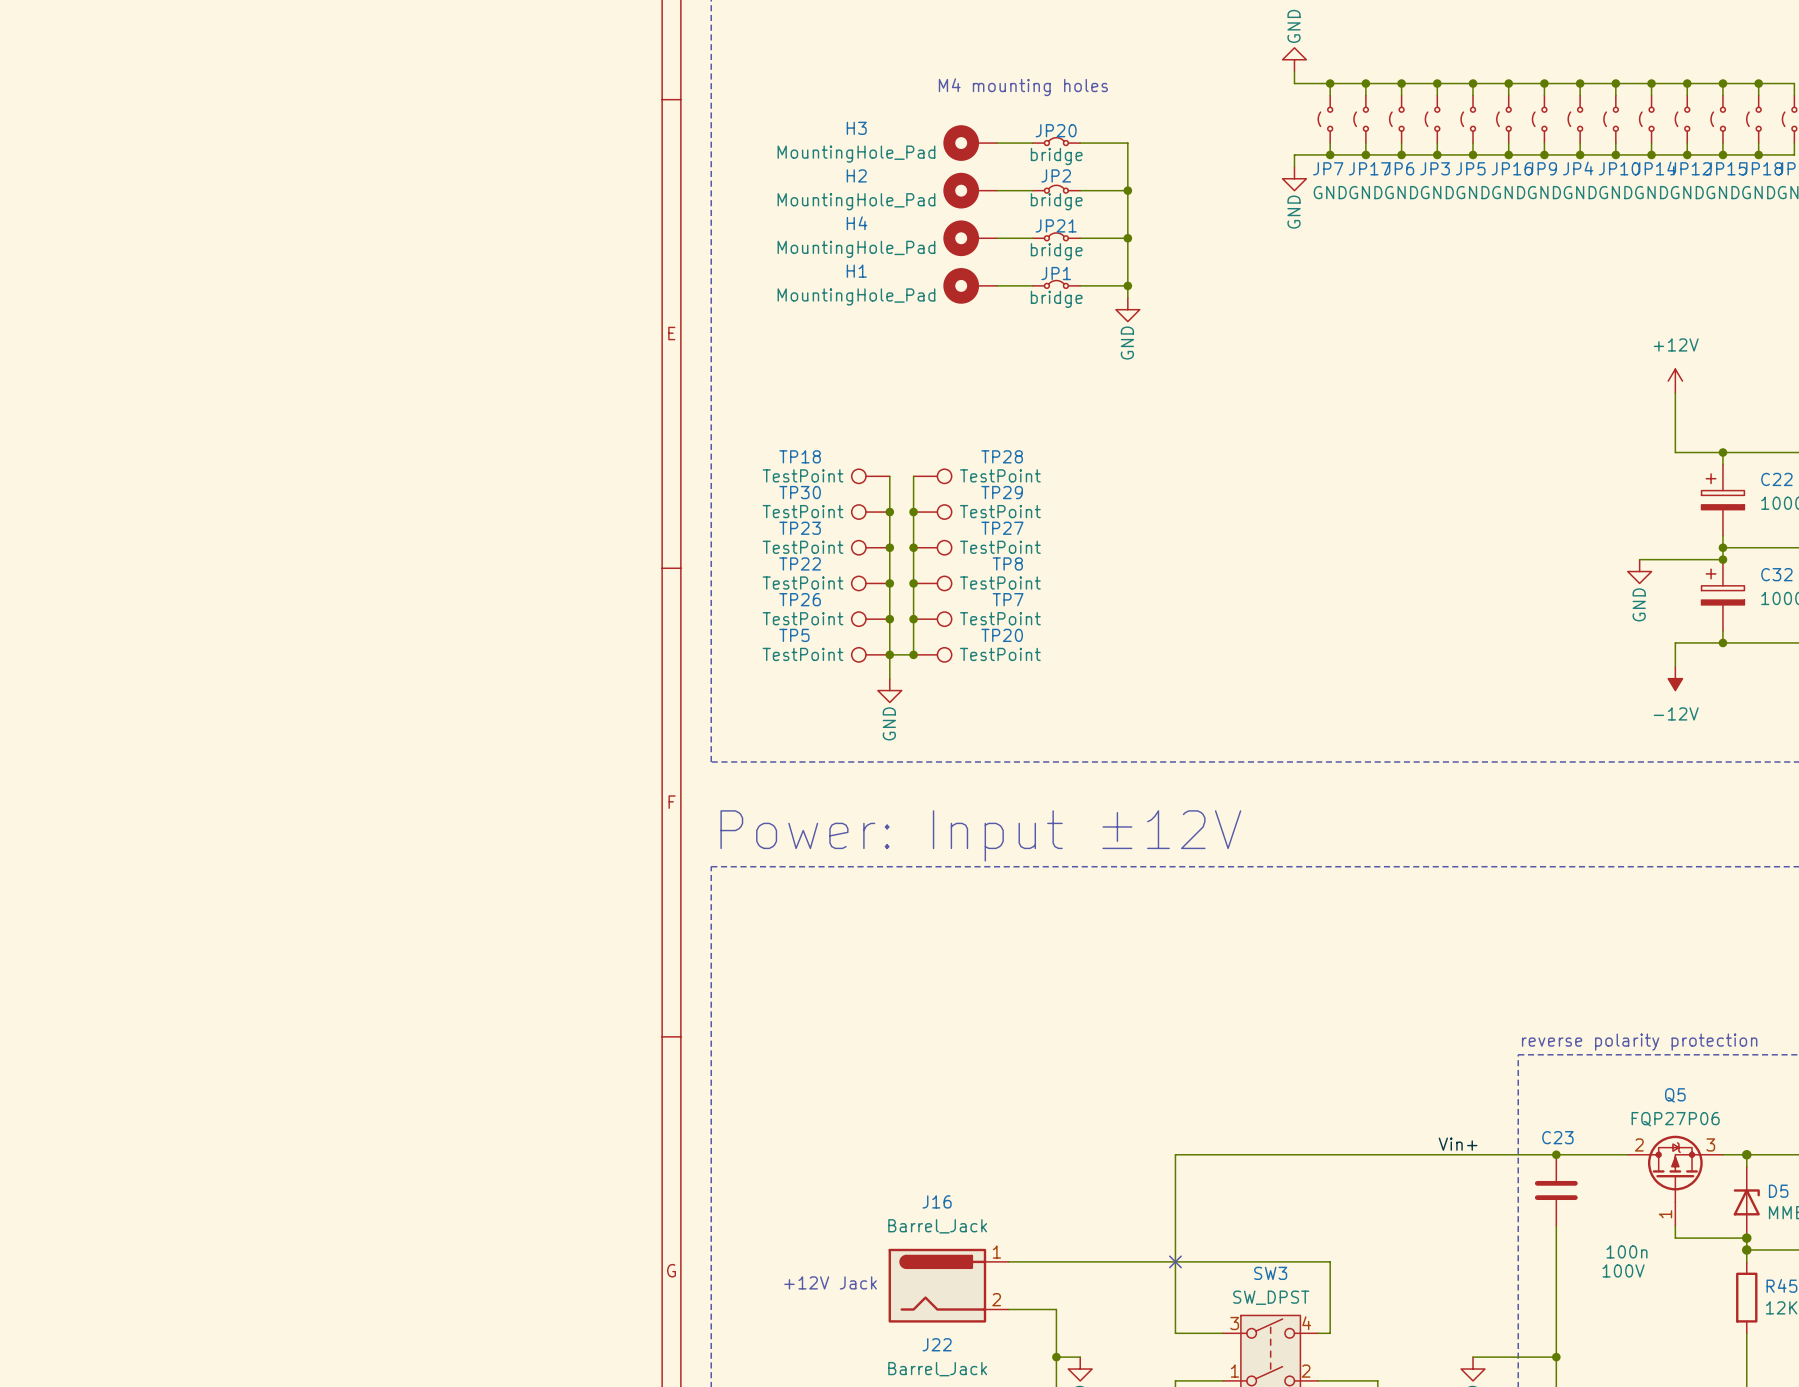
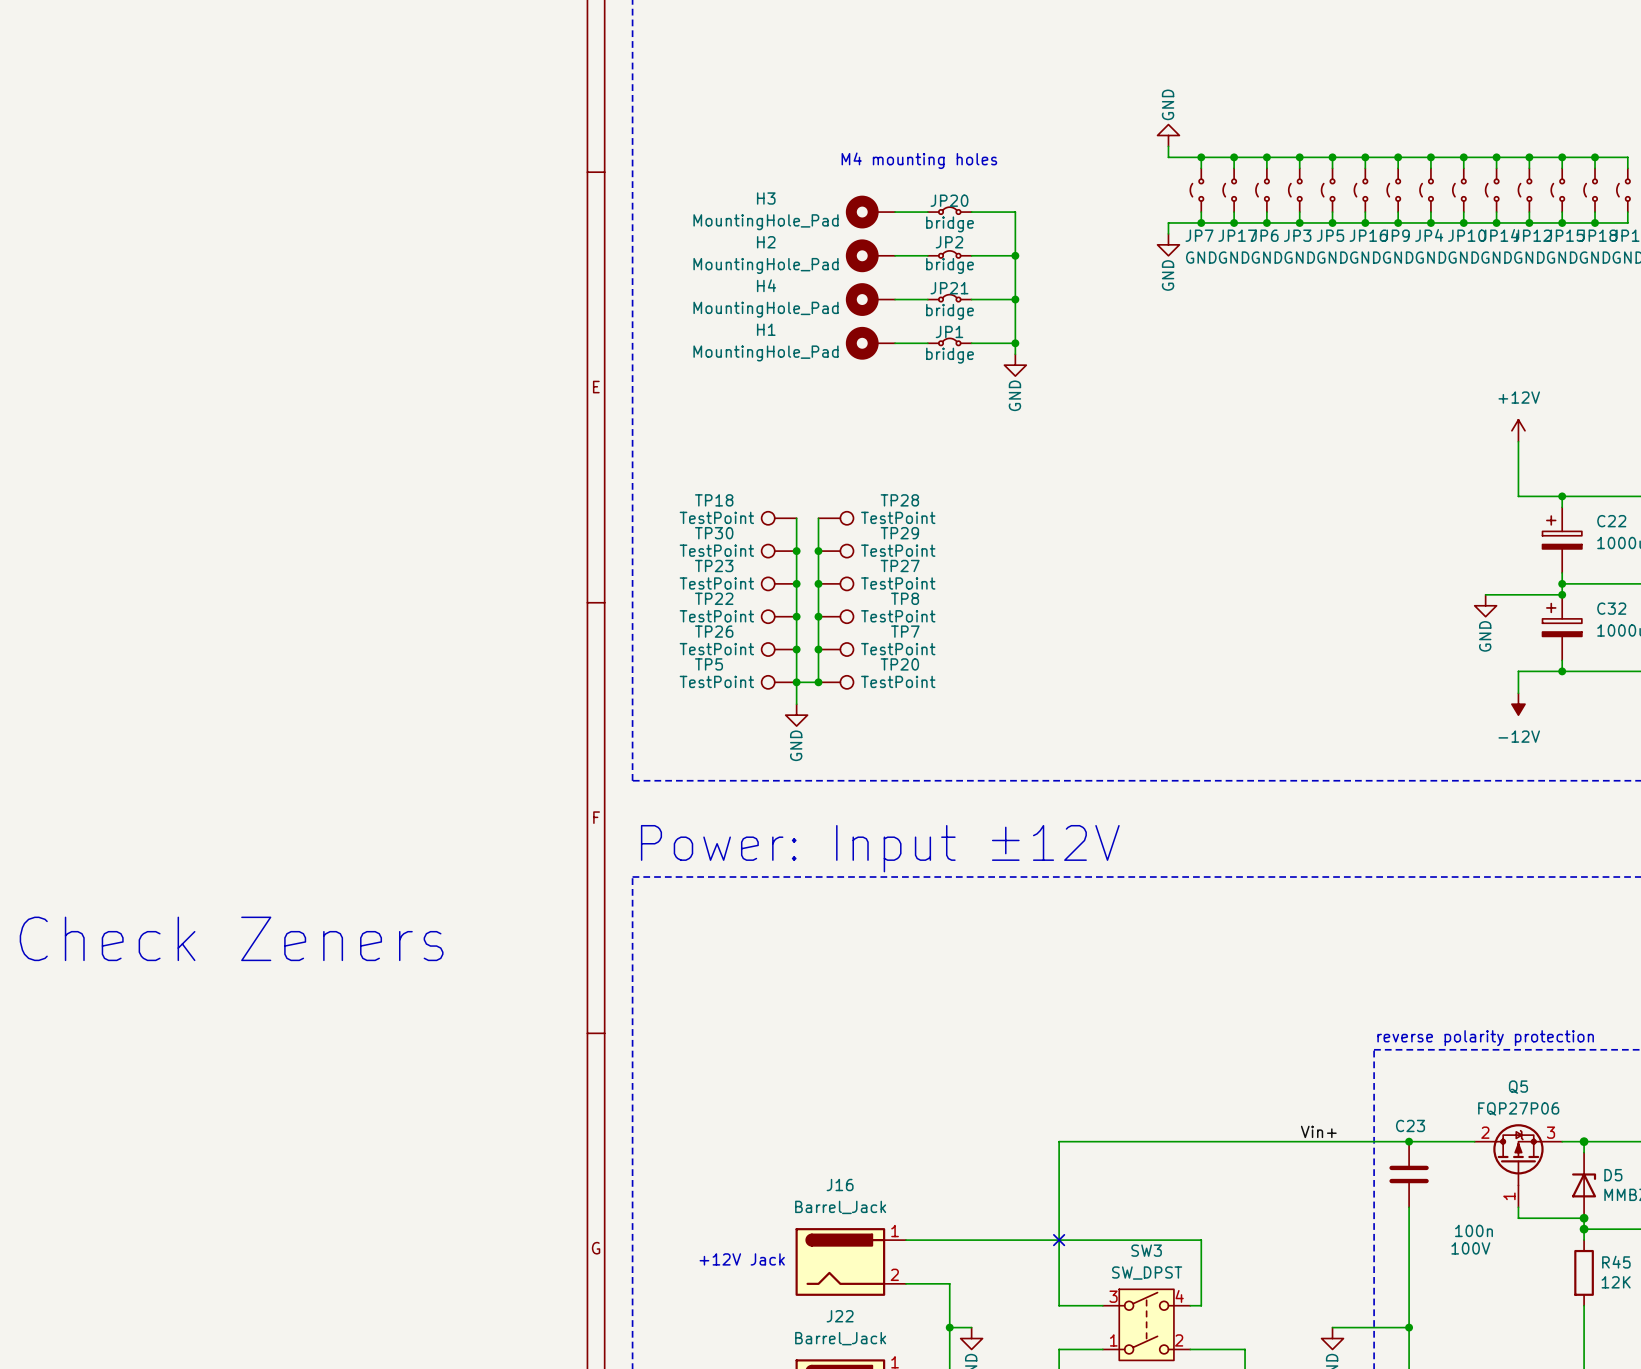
text: none -> Check Zeners (231, 938)

